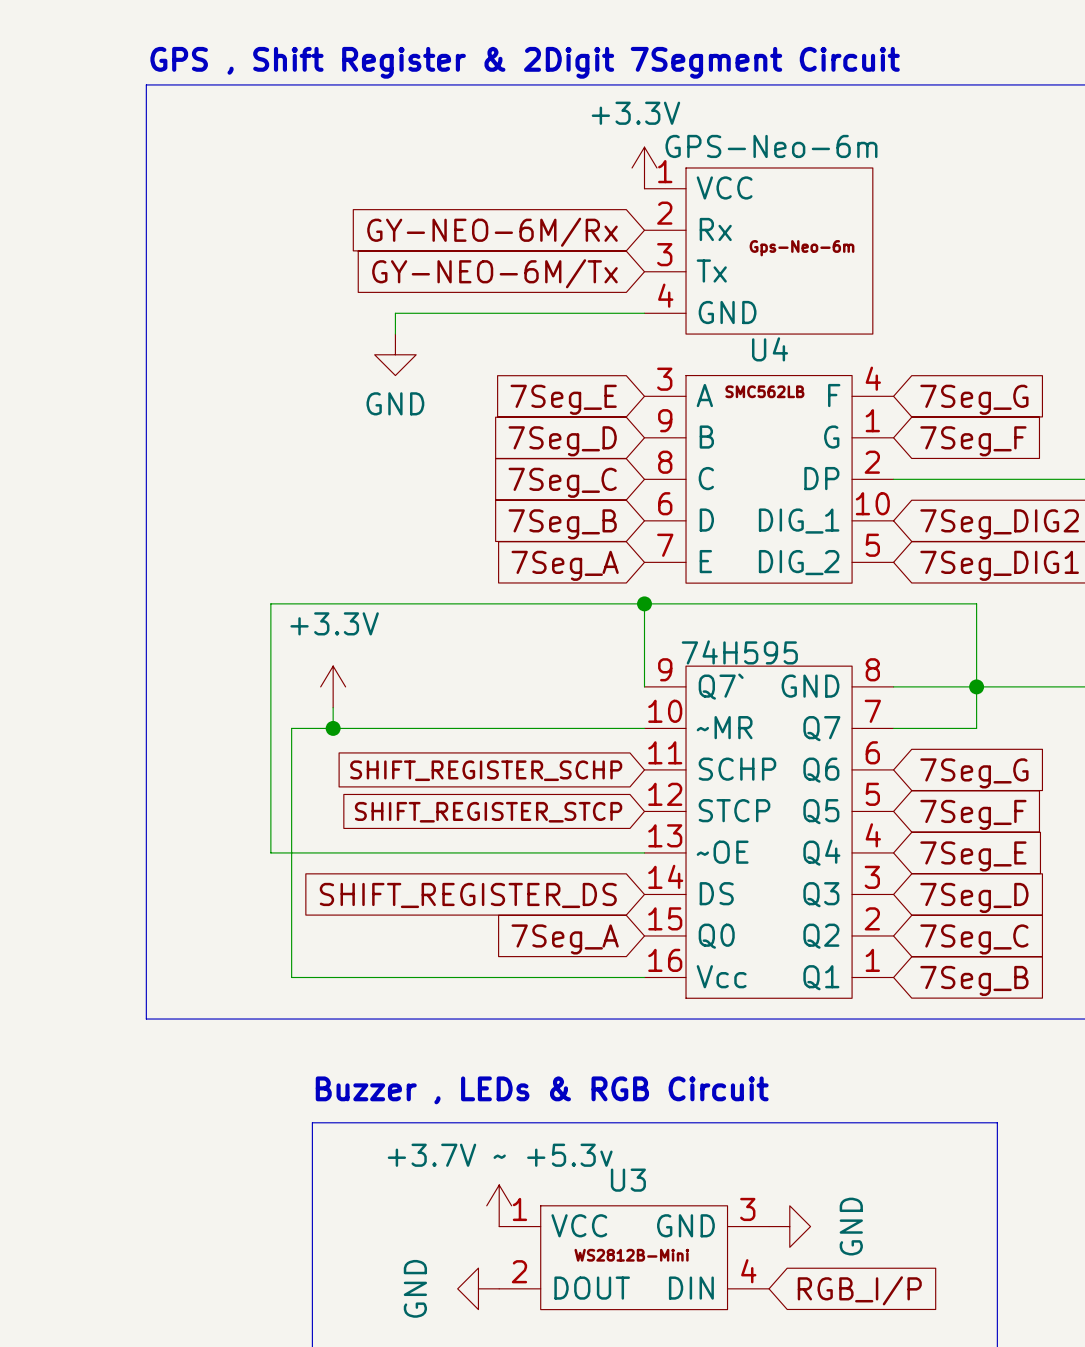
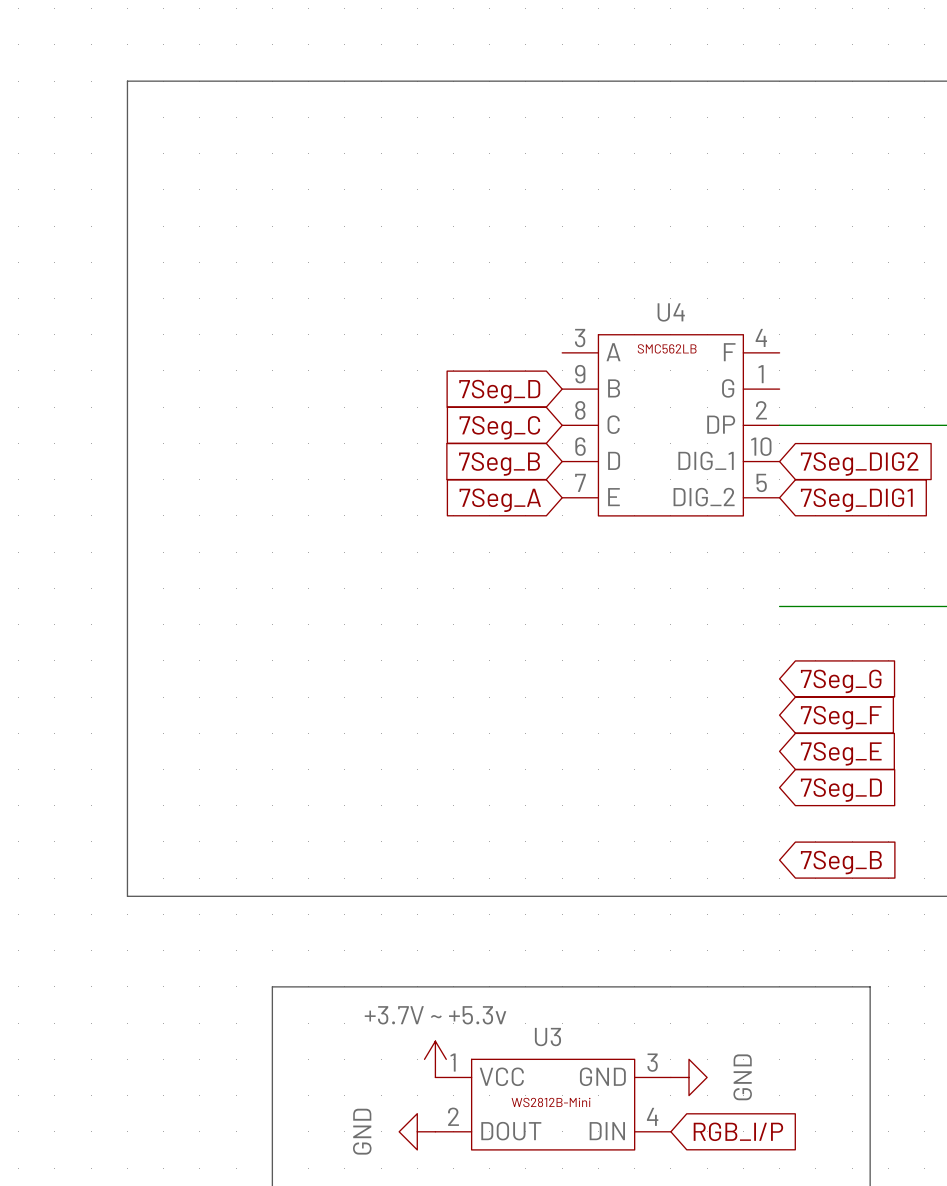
text: GPS , Shift Register & 2Digit 7Segment Circuit (525, 62) -> none
power symbol: +3.3V (644, 167) -> none
global label: GY-NEO-6M/Rx (492, 232) -> none
GPS-Neo-6m: (758, 251) -> none
global label: GY-NEO-6M/Tx (494, 273) -> none
wire: (644, 313) (395, 313) (395, 334) -> none
power symbol: GND (395, 354) -> none
global label: 7Seg_E (563, 399) -> none
global label: 7Seg_G (974, 399) -> none
global label: 7Seg_F (973, 441) -> none
wire: (644, 603) (644, 686) -> none
junction: (644, 603) -> none
power symbol: +3.3V (333, 686) -> none
junction: (976, 686) -> none
wire: (333, 707) (333, 728) -> none
junction: (333, 728) -> none
wire: (644, 728) (291, 728) (291, 977) (644, 977) -> none
wire: (893, 728) (976, 728) (976, 603) (270, 603) (270, 852) (644, 852) -> none
global label: SHIFT_REGISTER_SCHP (486, 770) -> none
global label: SHIFT_REGISTER_STCP (488, 812) -> none
74H595: (769, 832) -> none
global label: SHIFT_REGISTER_DS (468, 895) -> none
global label: 7Seg_A (565, 939) -> none
global label: 7Seg_C (974, 939) -> none
text: Buzzer , LEDs & RGB Circuit (542, 1090) -> none

